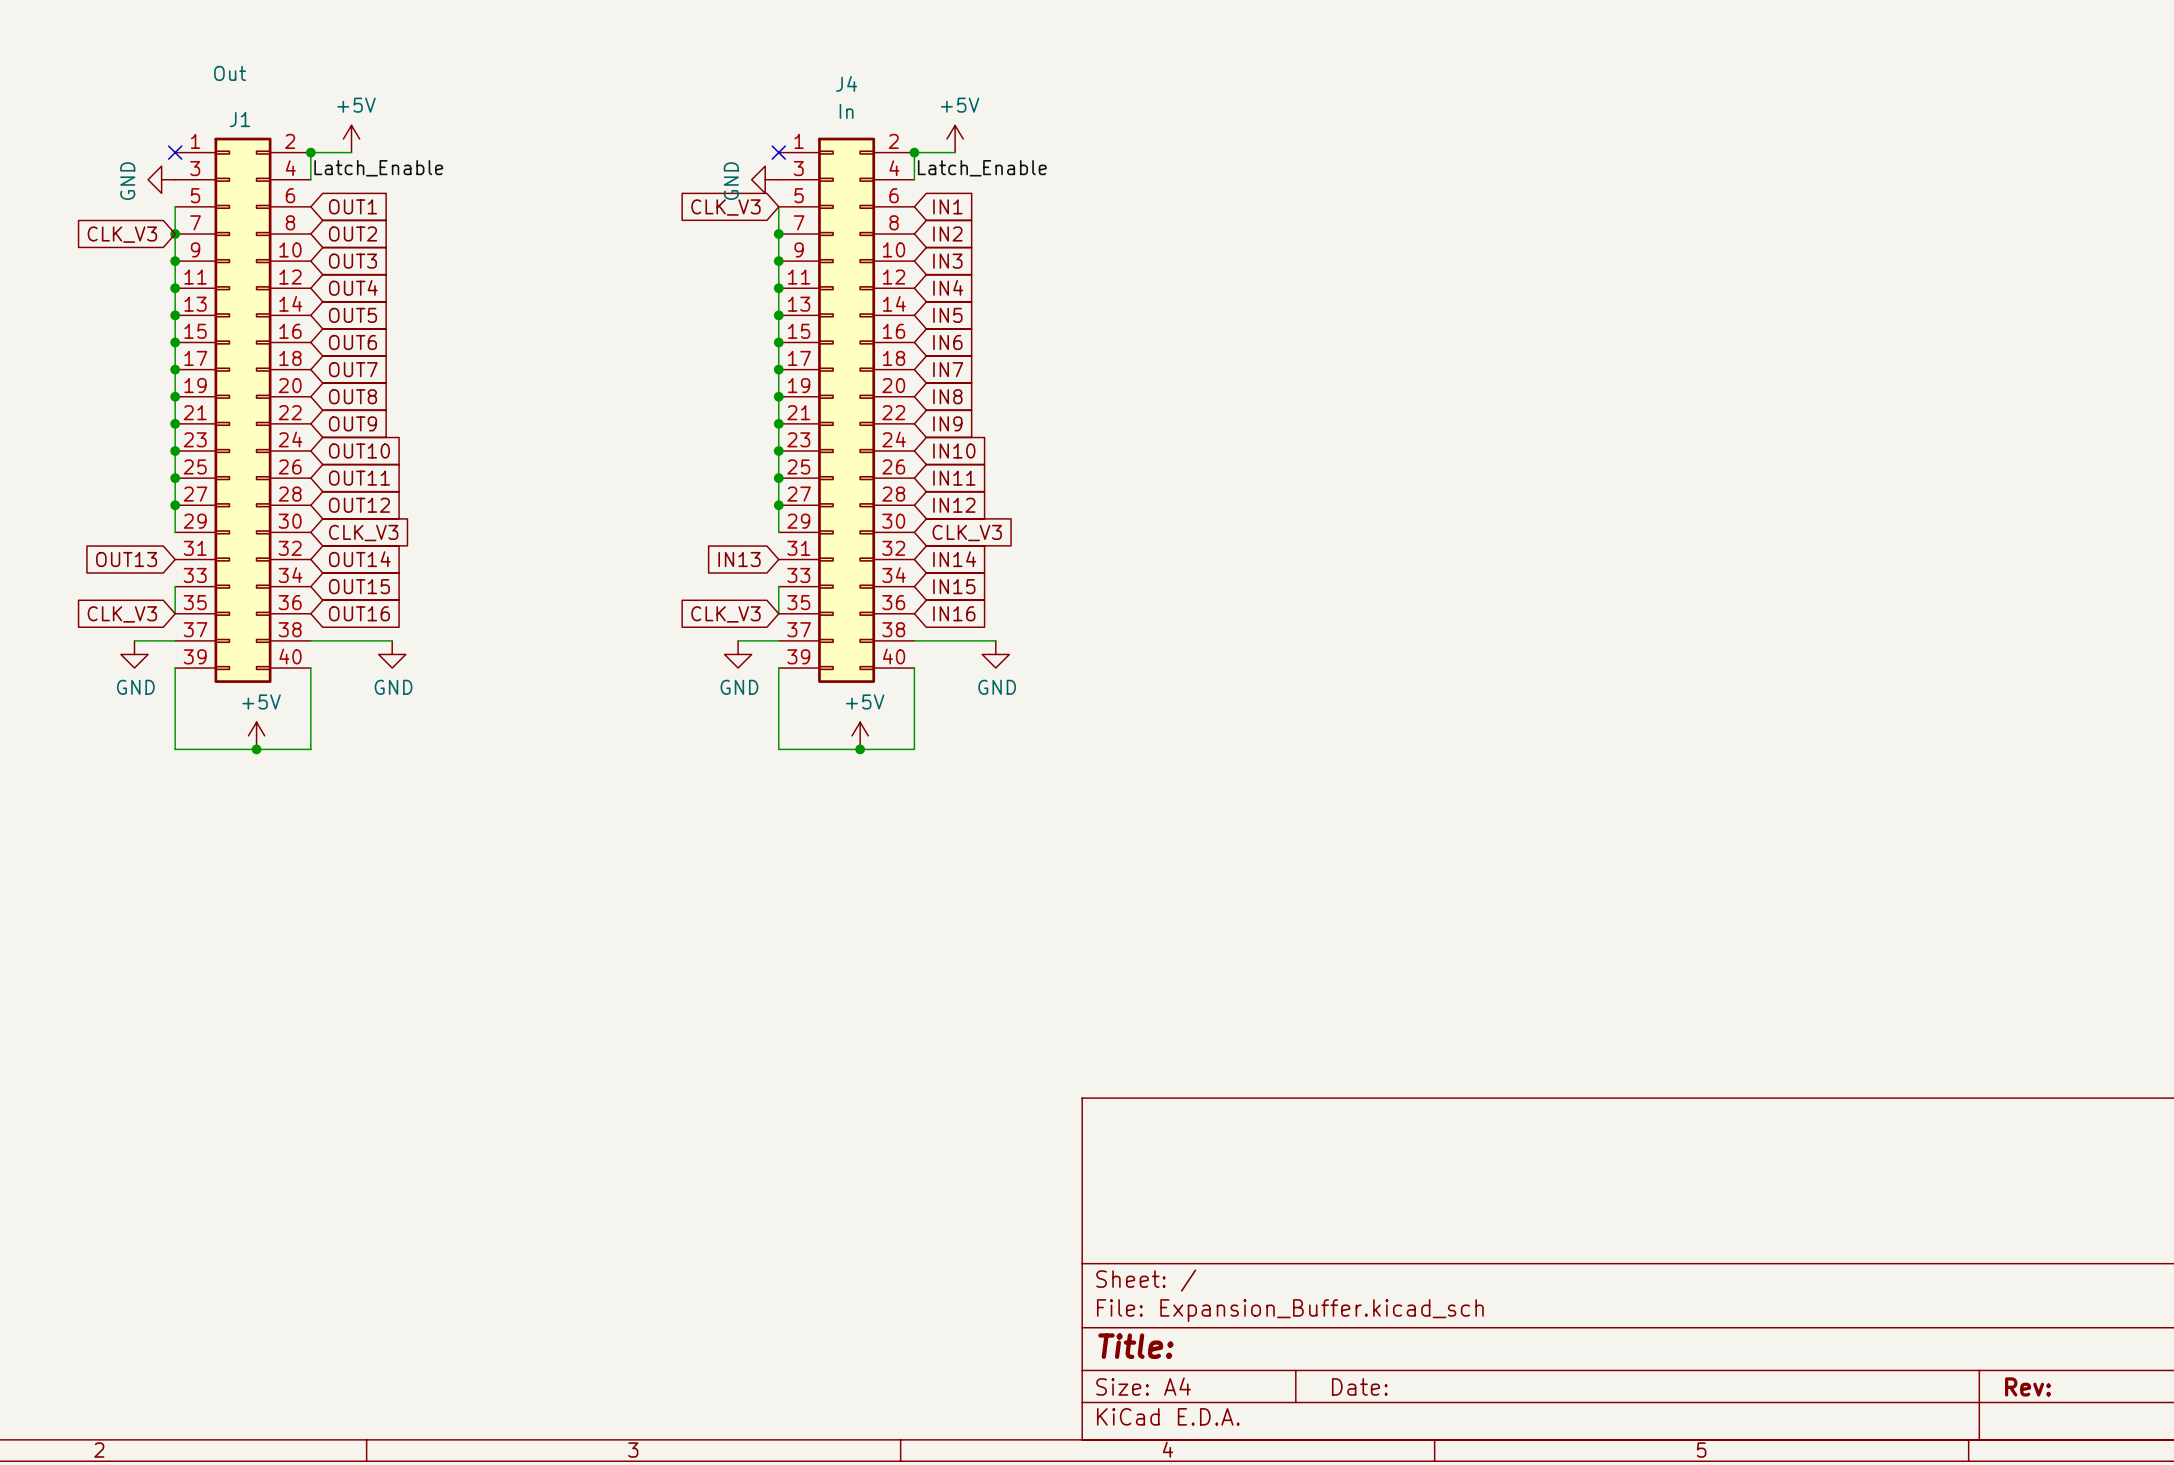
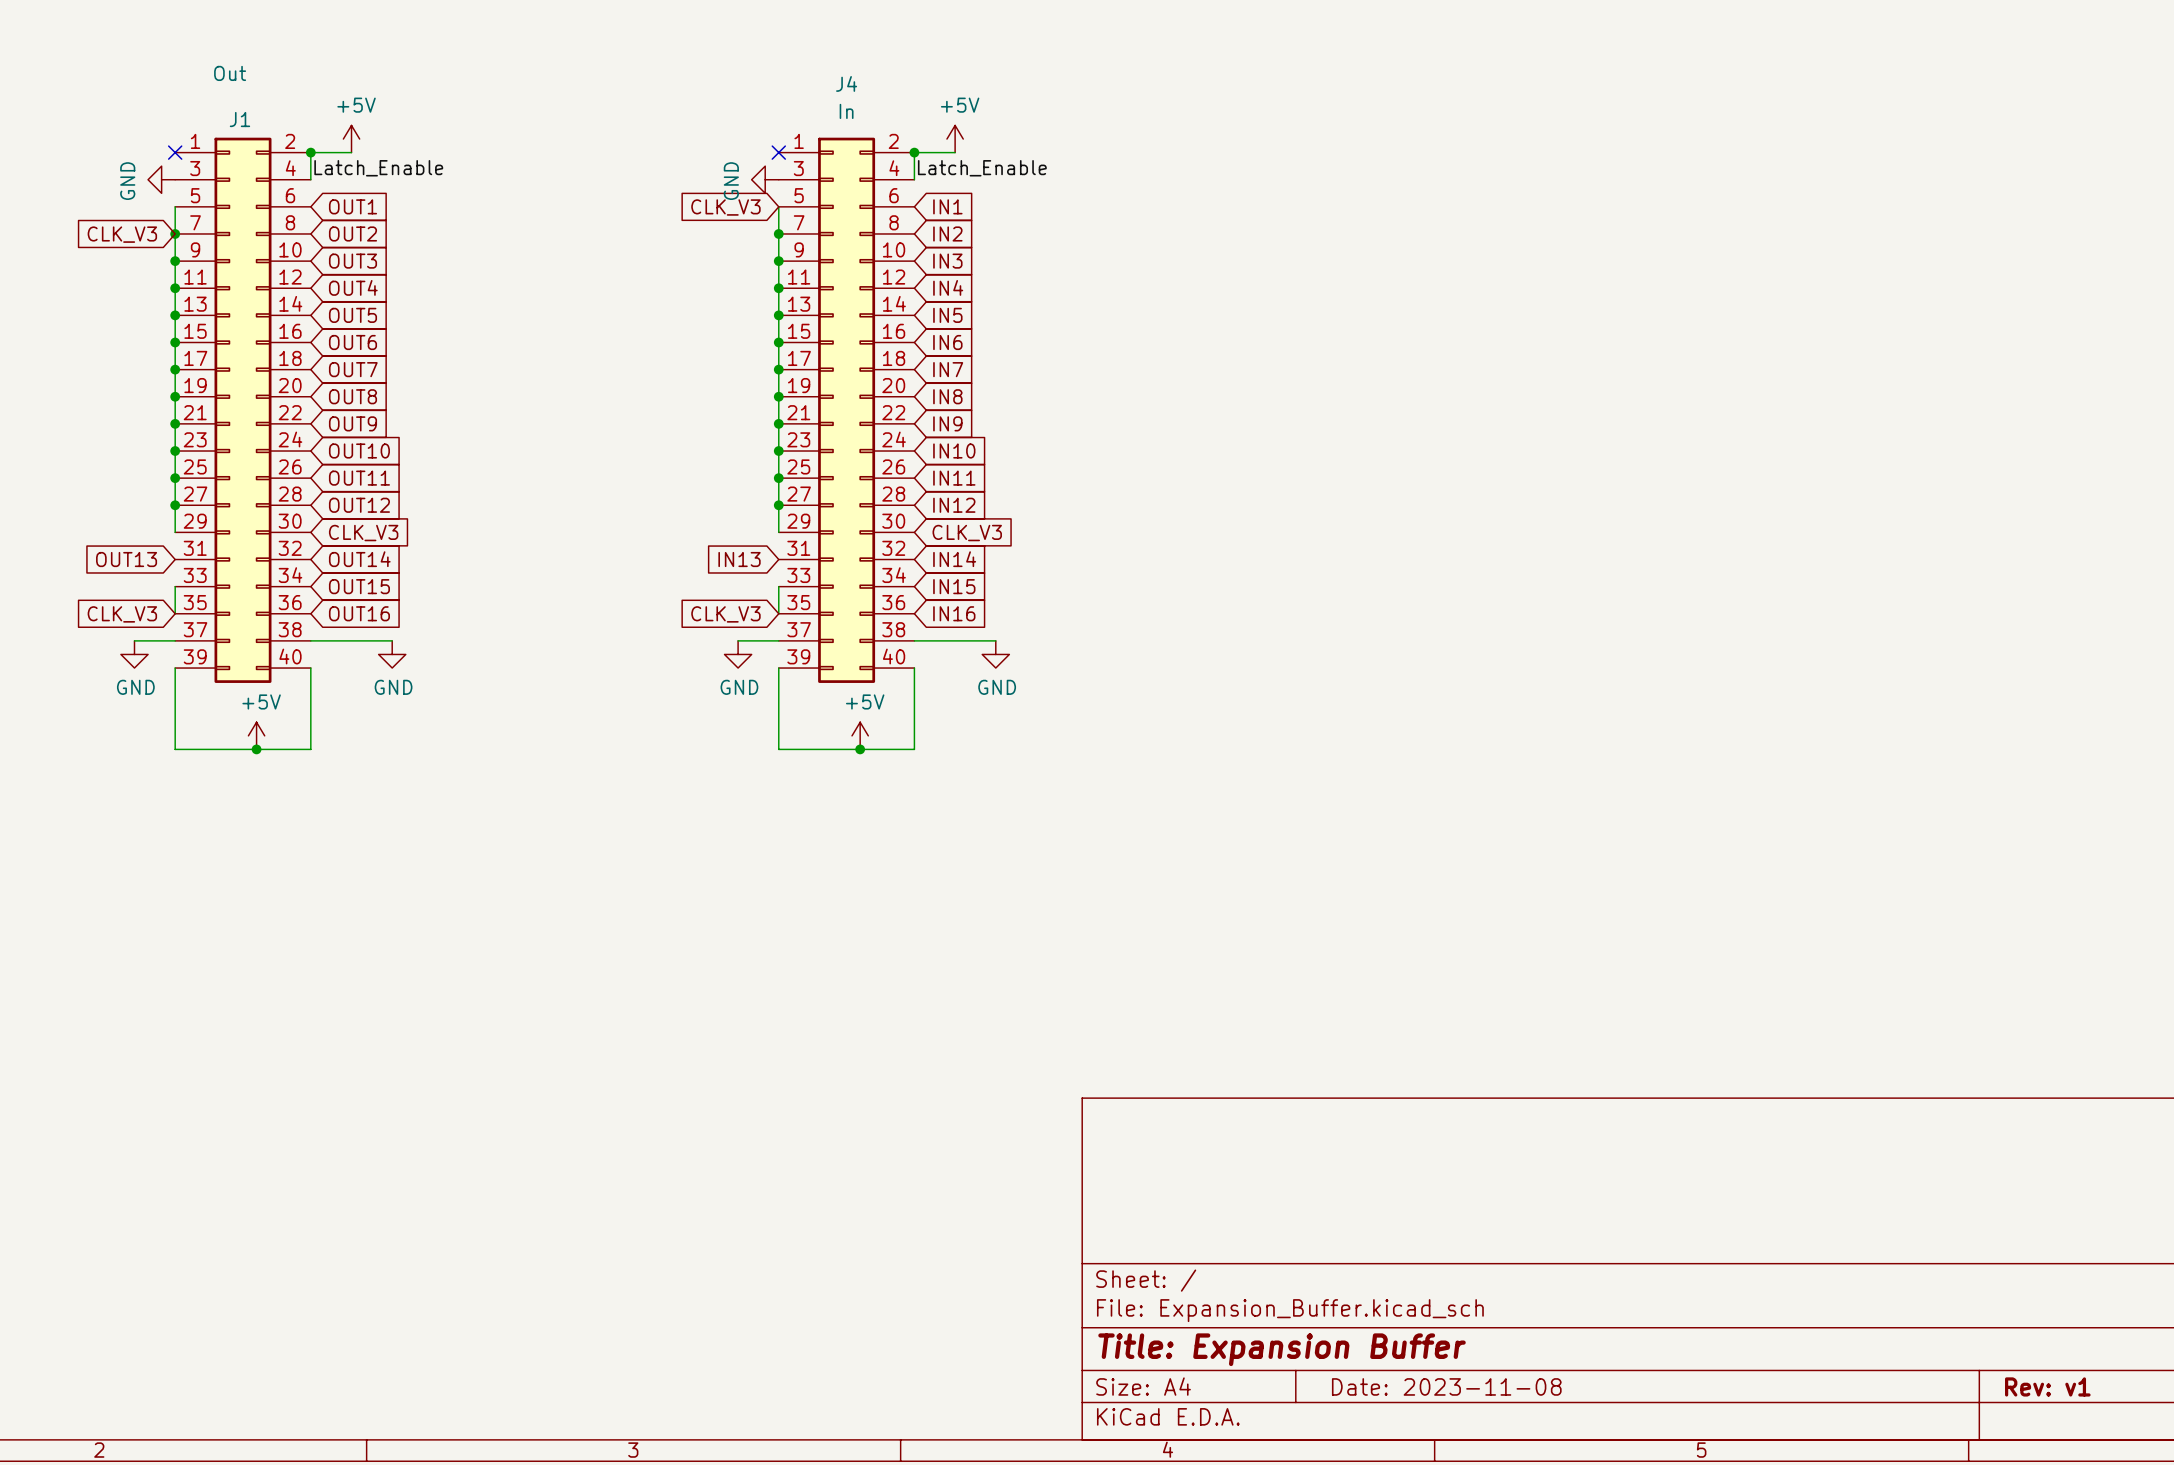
title block: Title: (1135, 1346) -> Title: Expansion Buffer (1282, 1349)
title block: Date: (1359, 1386) -> Date: 2023-11-08 (1446, 1386)
title block: Rev: (2027, 1386) -> Rev: v1 (2047, 1386)

